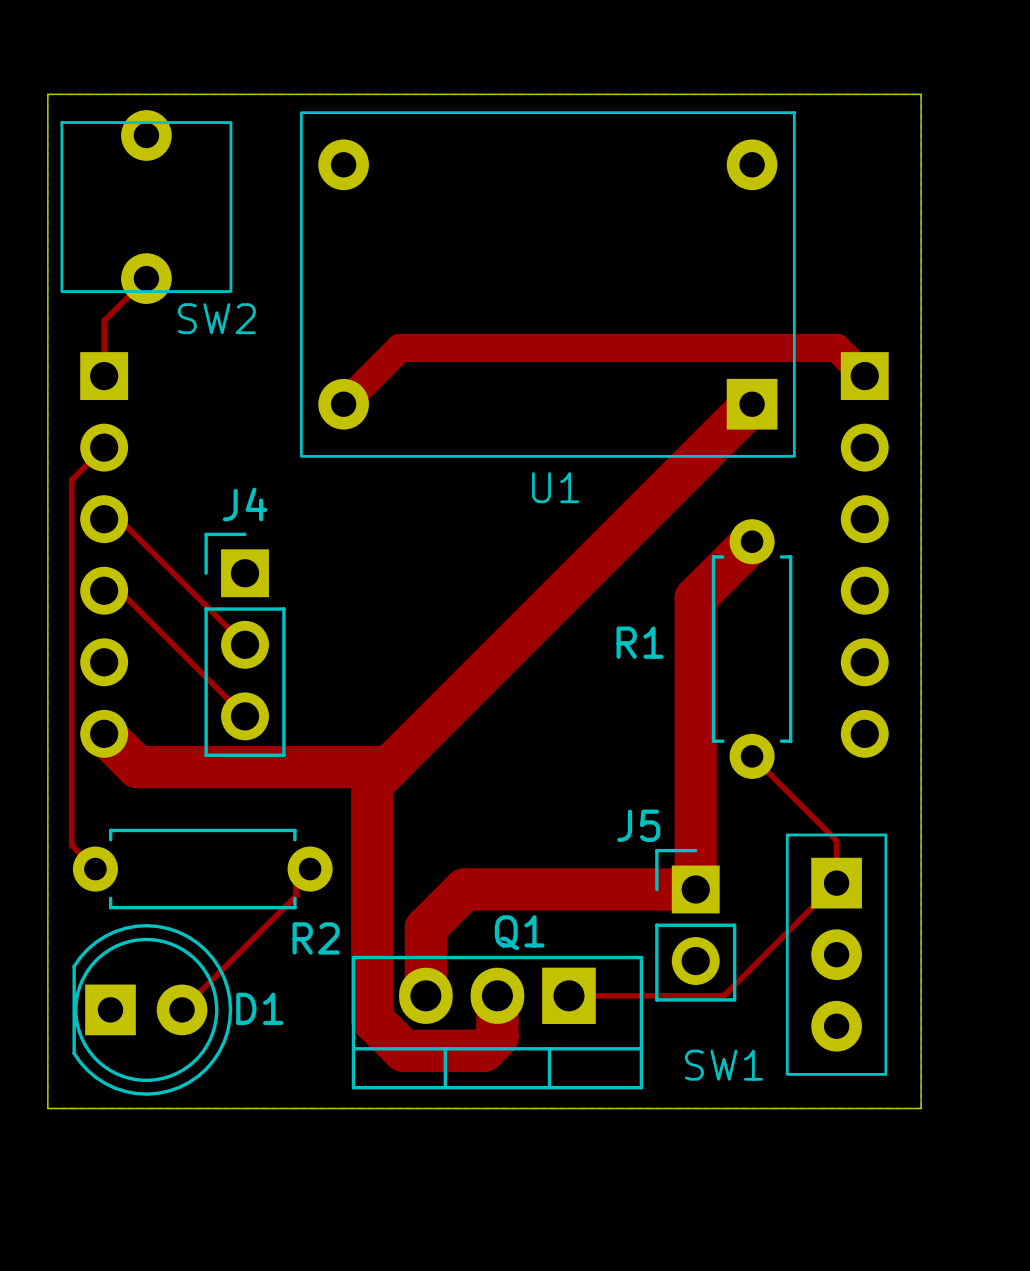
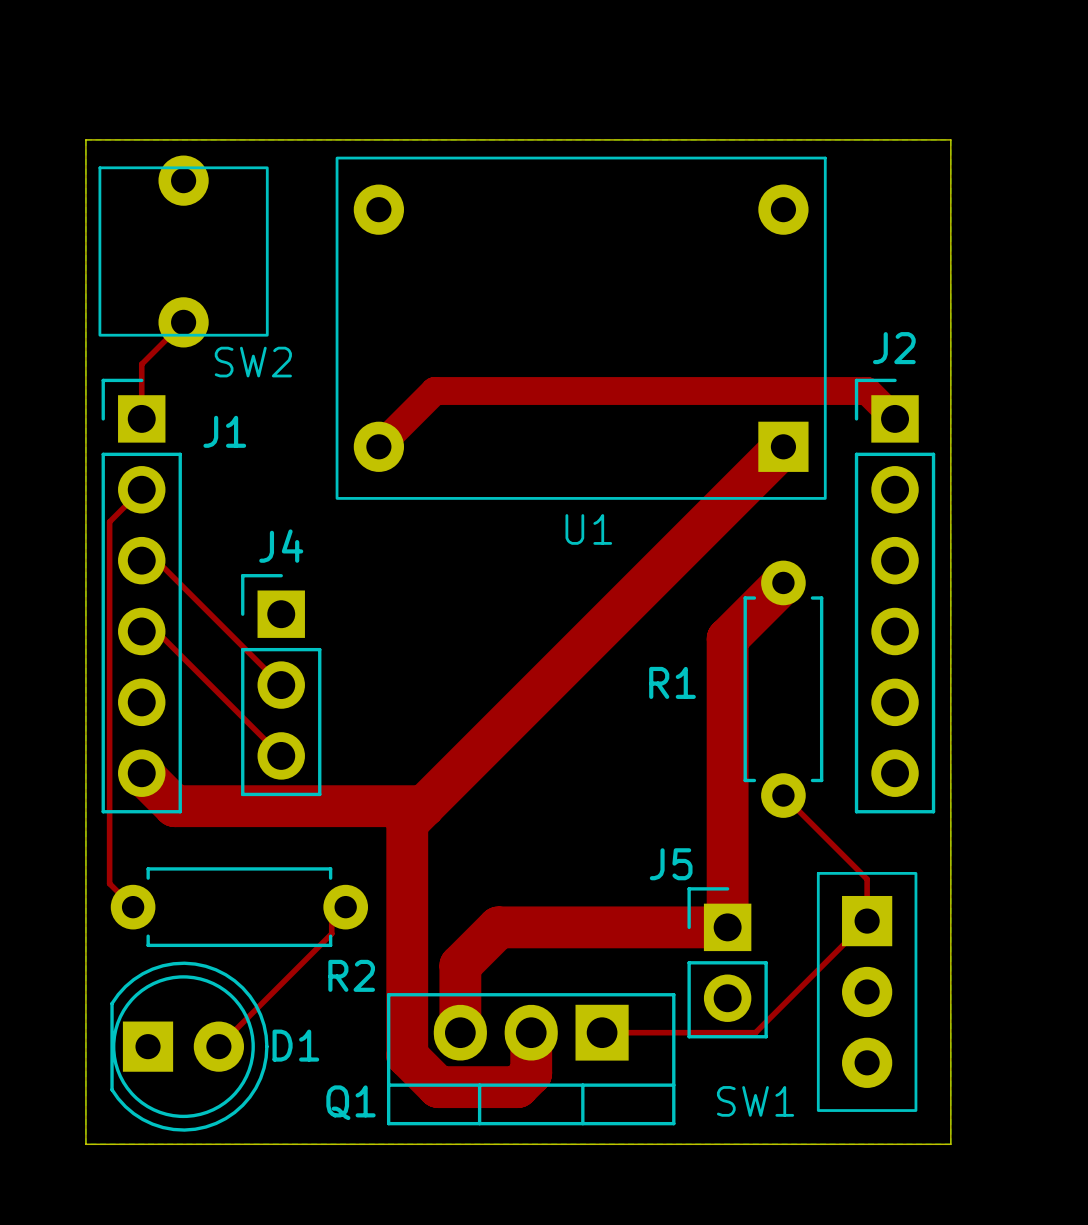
J1 side: bottom (104, 554) -> top (141, 596)
J2 side: bottom (864, 554) -> top (895, 596)
Q1 name position: Q1 (519, 932) -> Q1 (350, 1102)

